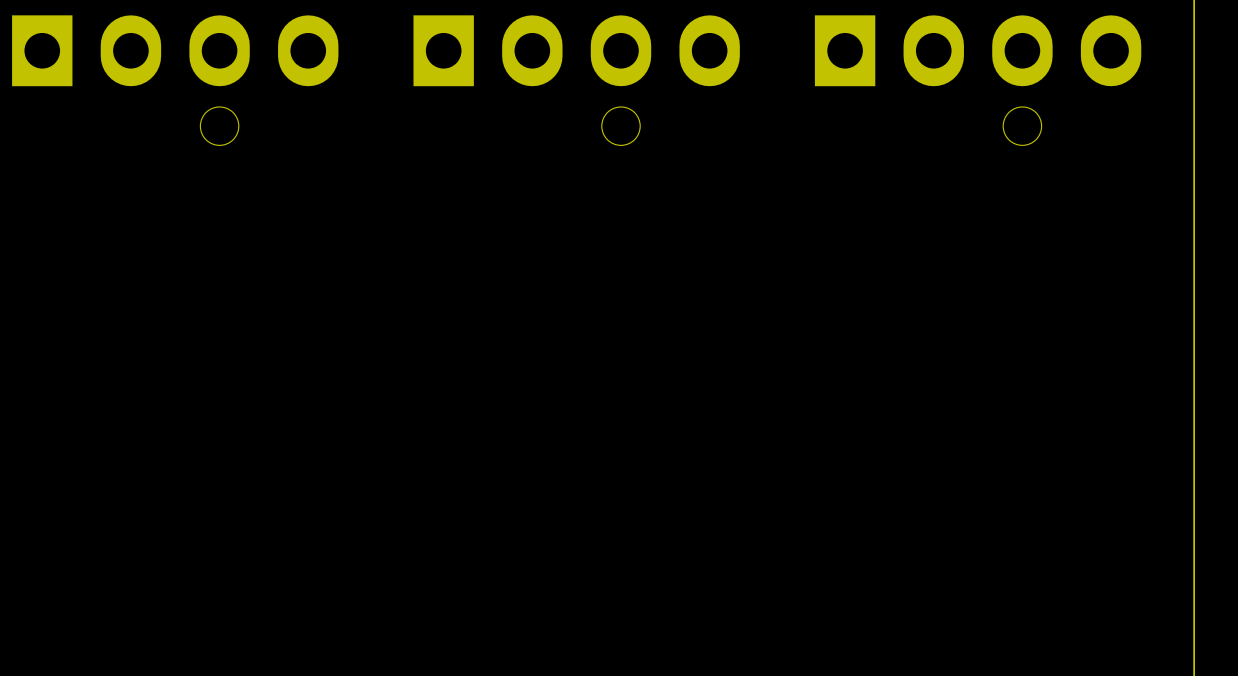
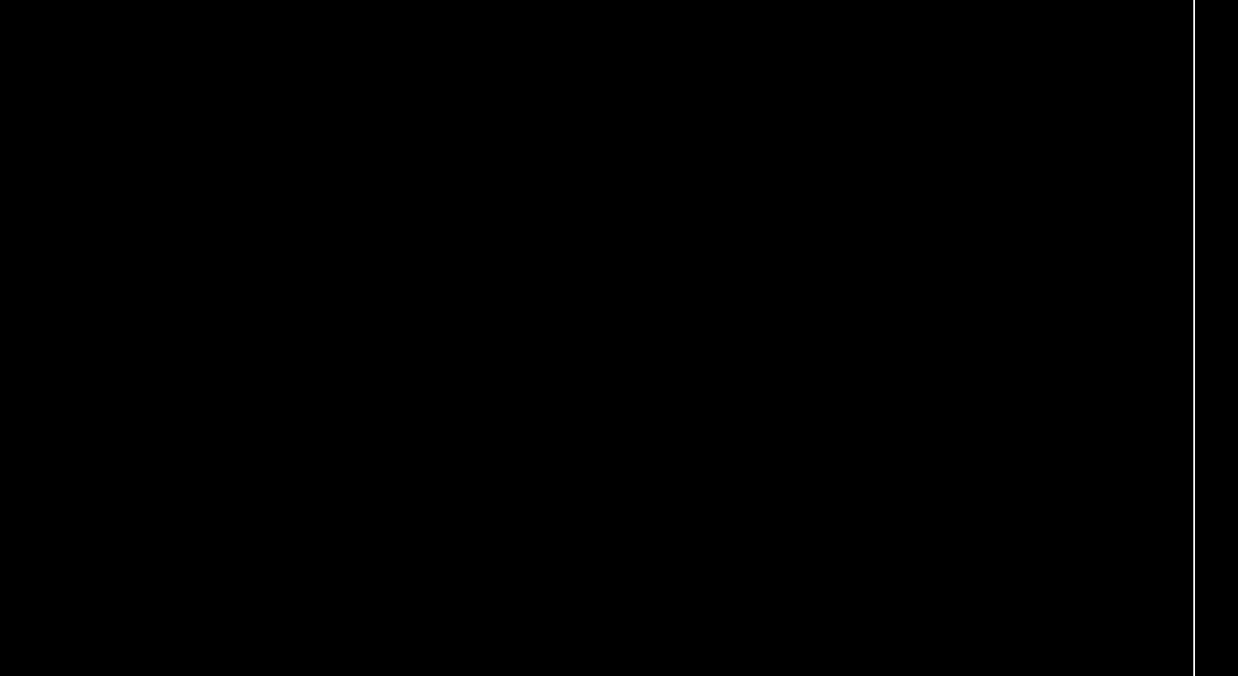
part: (175, 80) -> none
part: (576, 80) -> none
part: (978, 80) -> none

